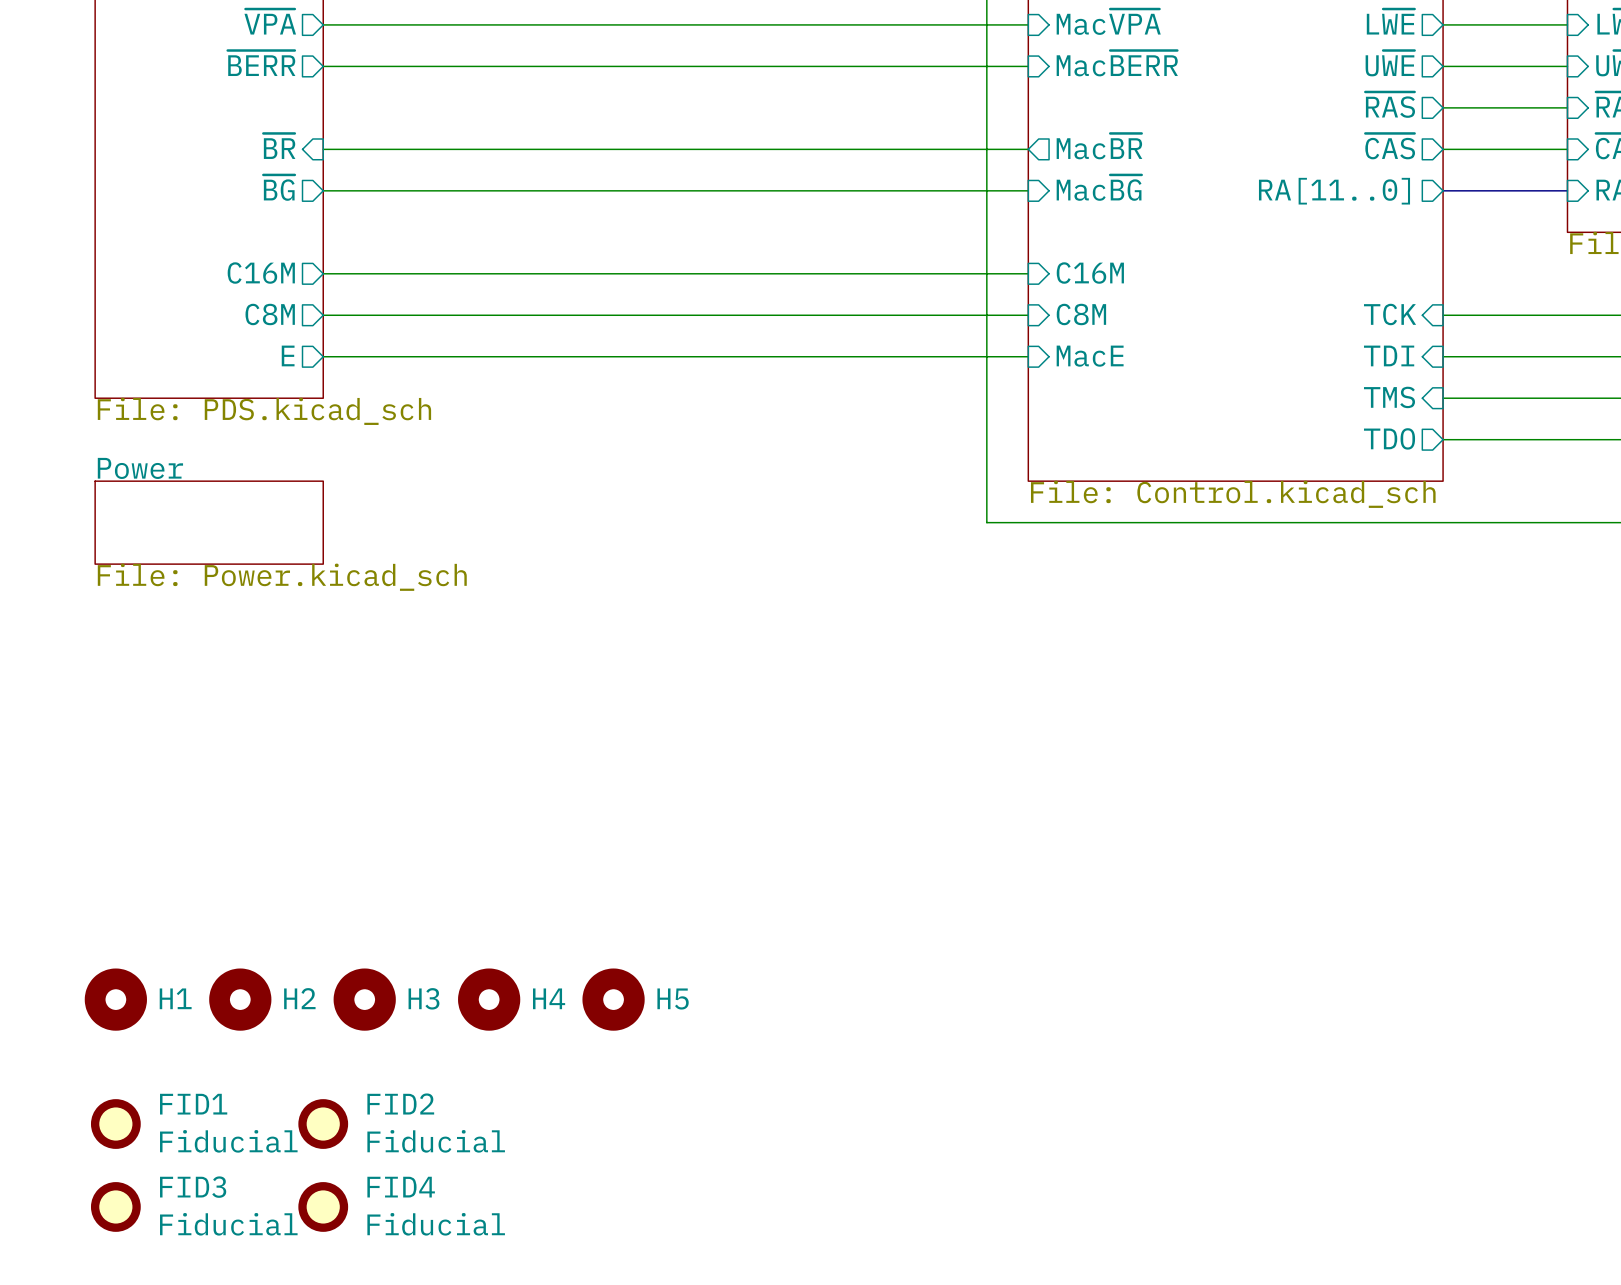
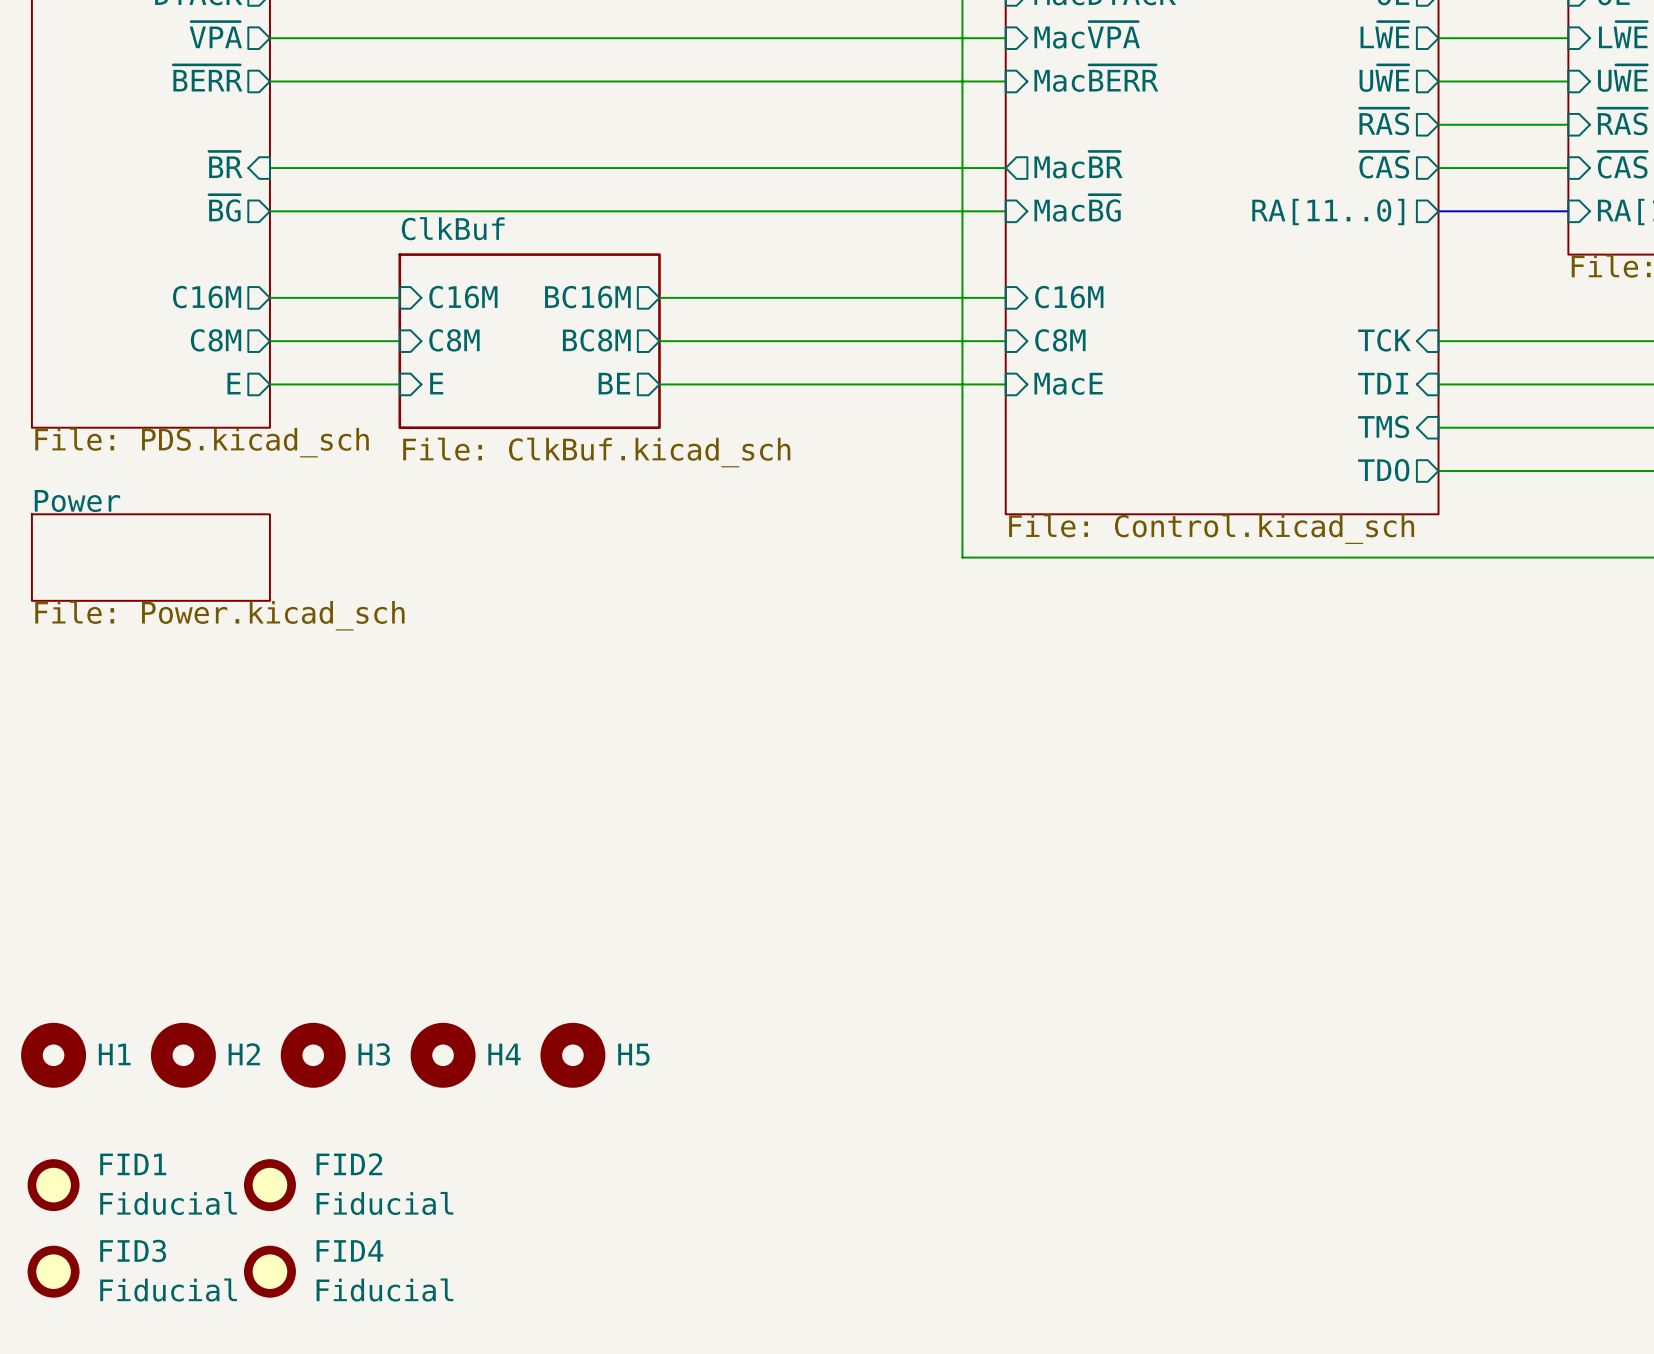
wire: (447, 273) (696, 273) -> none
sheet pin: none -> C16M (463, 297)
sheet pin: none -> BC16M (587, 297)
sheet pin: none -> C8M (454, 340)
sheet pin: none -> BC8M (596, 340)
wire: (447, 315) (696, 315) -> none
sheet ClkBuf: none -> File: ClkBuf.kicad_sch (529, 341)
sheet pin: none -> E (436, 383)
sheet pin: none -> BE (614, 383)
wire: (447, 356) (696, 356) -> none

